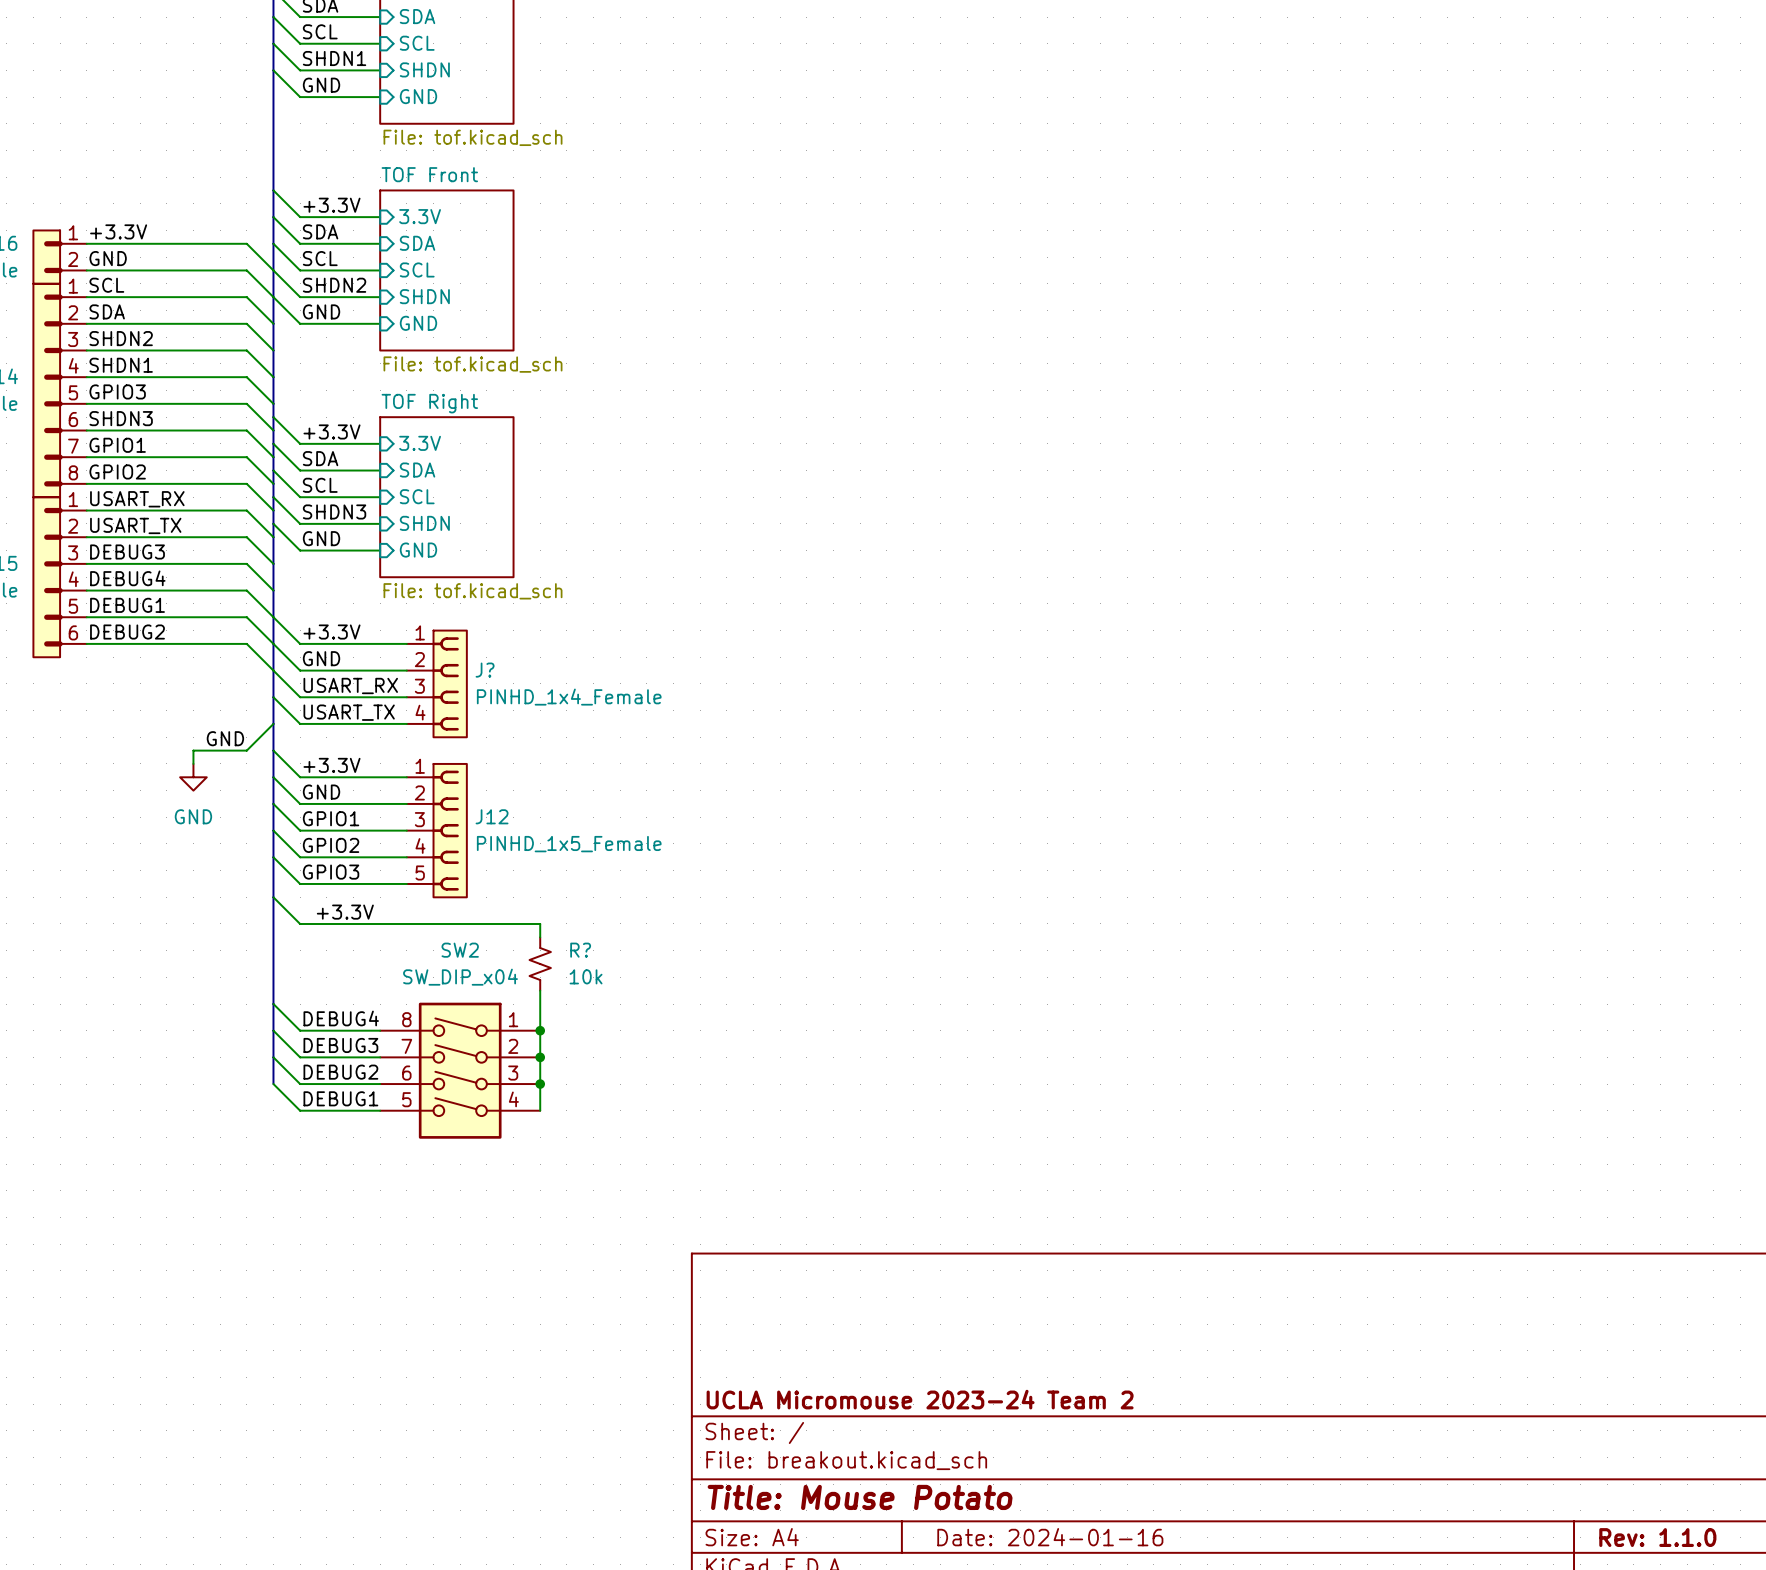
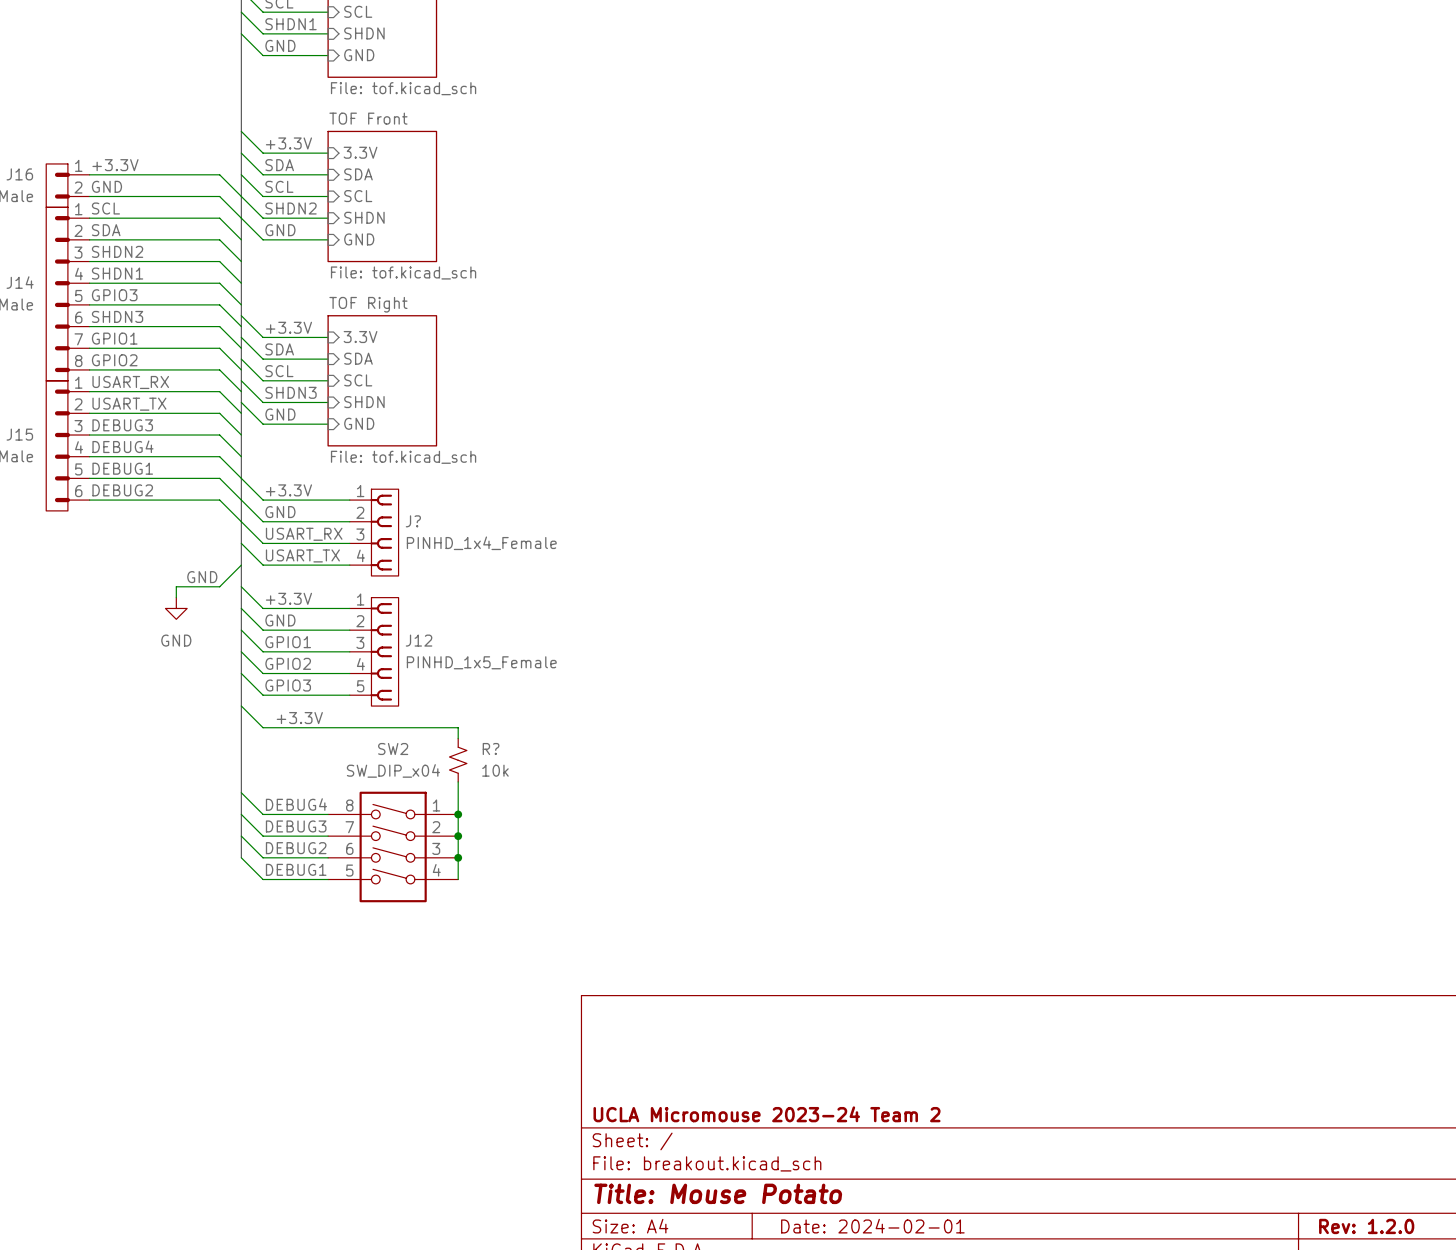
title block: Date: 2024-01-16 (1050, 1537) -> Date: 2024-02-01 (872, 1226)
title block: Rev: 1.1.0 (1657, 1537) -> Rev: 1.2.0 (1366, 1226)

